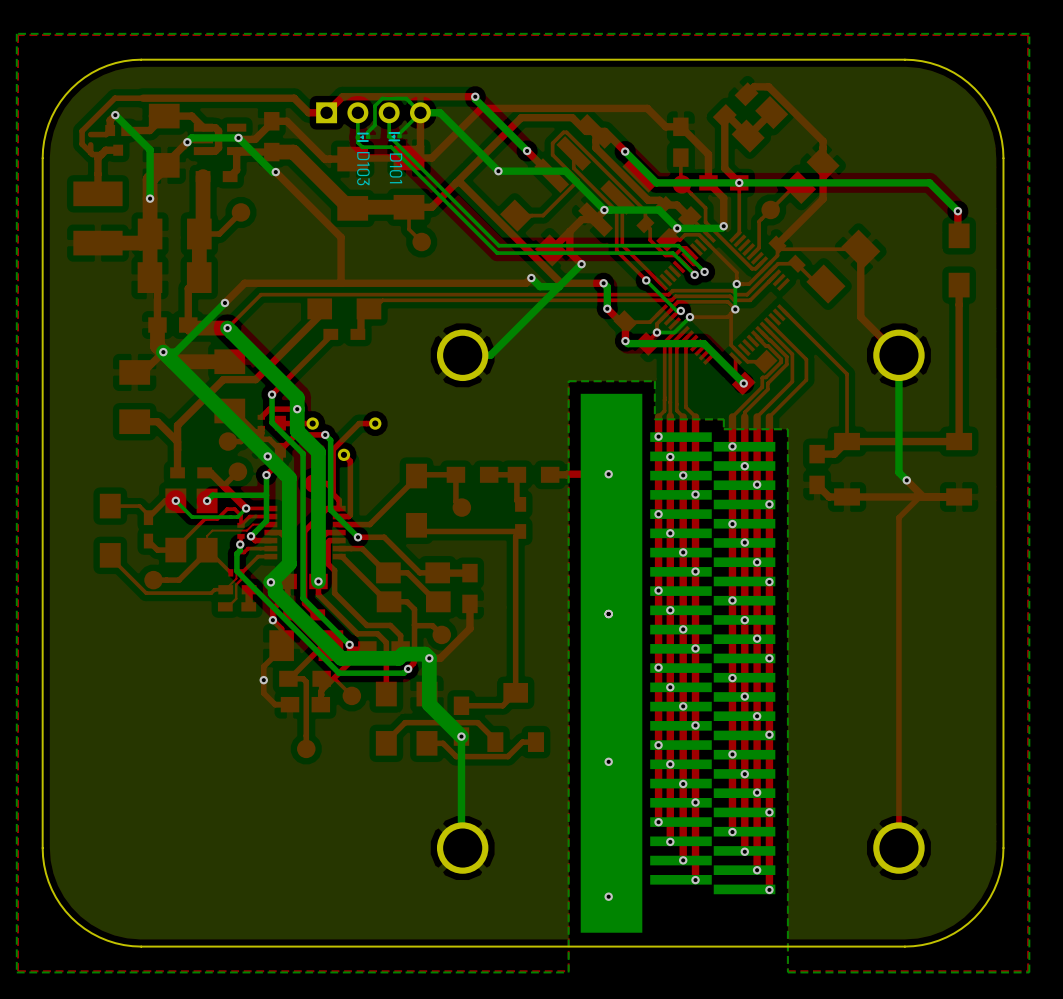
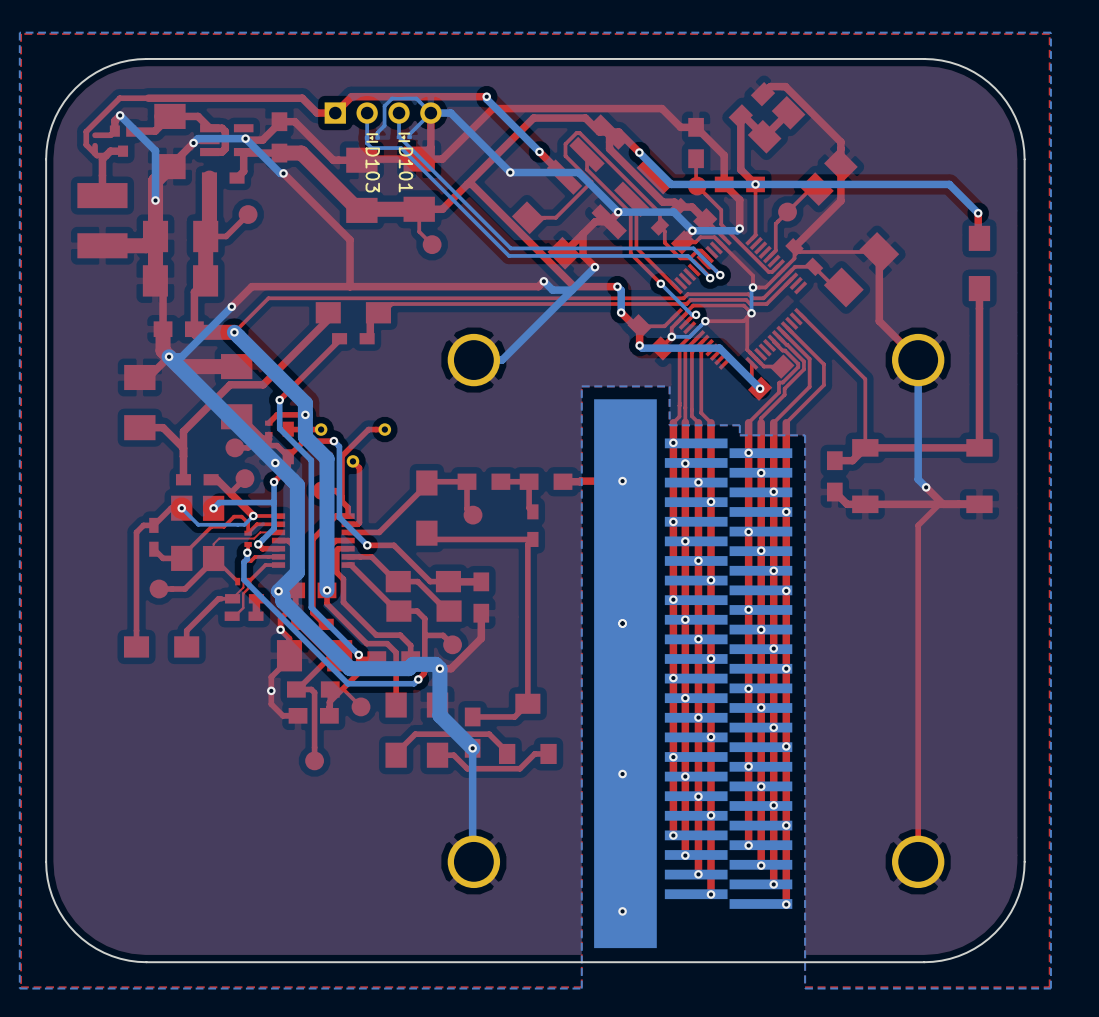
top track: (110, 506) (139, 506) (148, 514) -> none
top track: none -> (153, 525) (143, 525) (136, 532) (136, 646)
part rotation: 0° (110, 530) -> 90° clockwise (161, 646)
part position: (110, 530) -> (161, 646)
top track: (110, 555) (146, 593) (211, 593) (214, 589) -> (186, 646) (186, 630) (218, 598) (221, 598)

